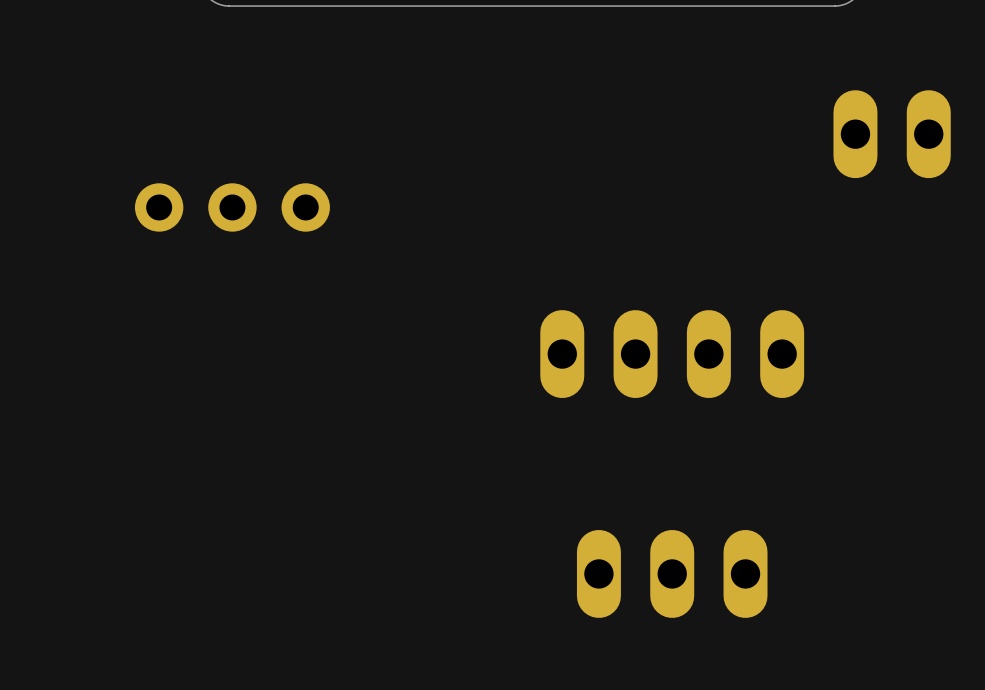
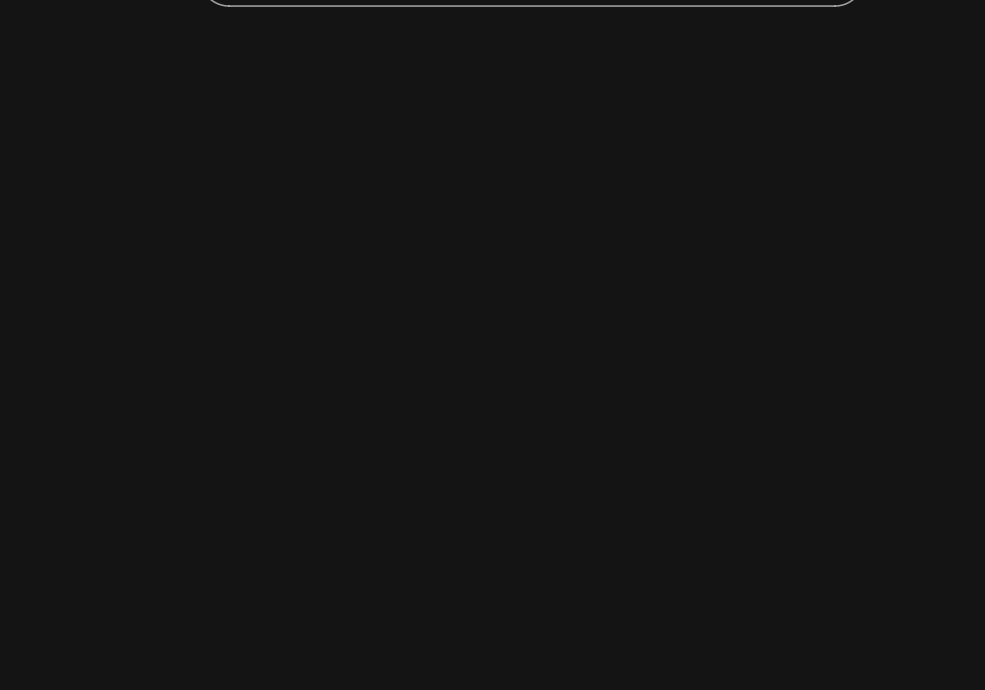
part: (892, 134) -> none
part: (232, 207) -> none
part: (672, 354) -> none
part: (672, 573) -> none

